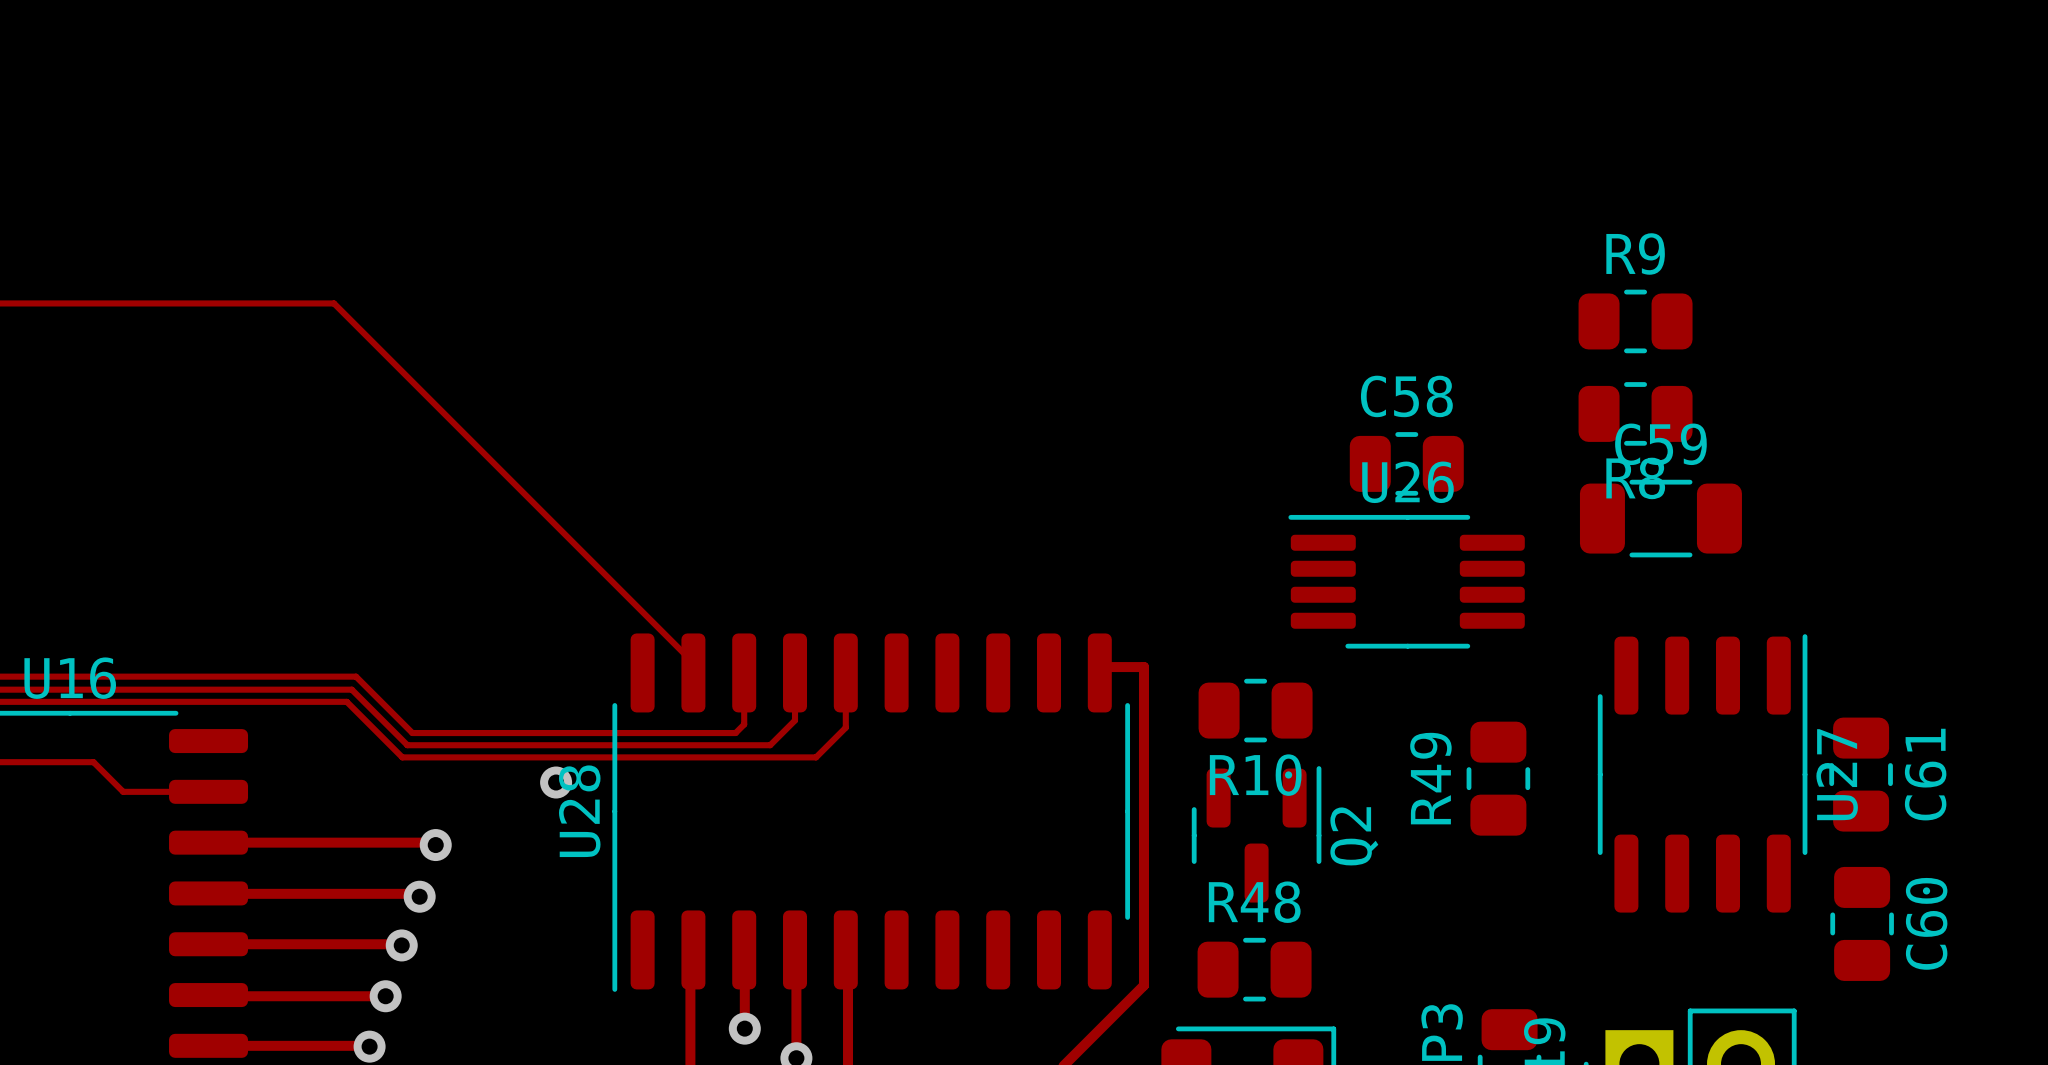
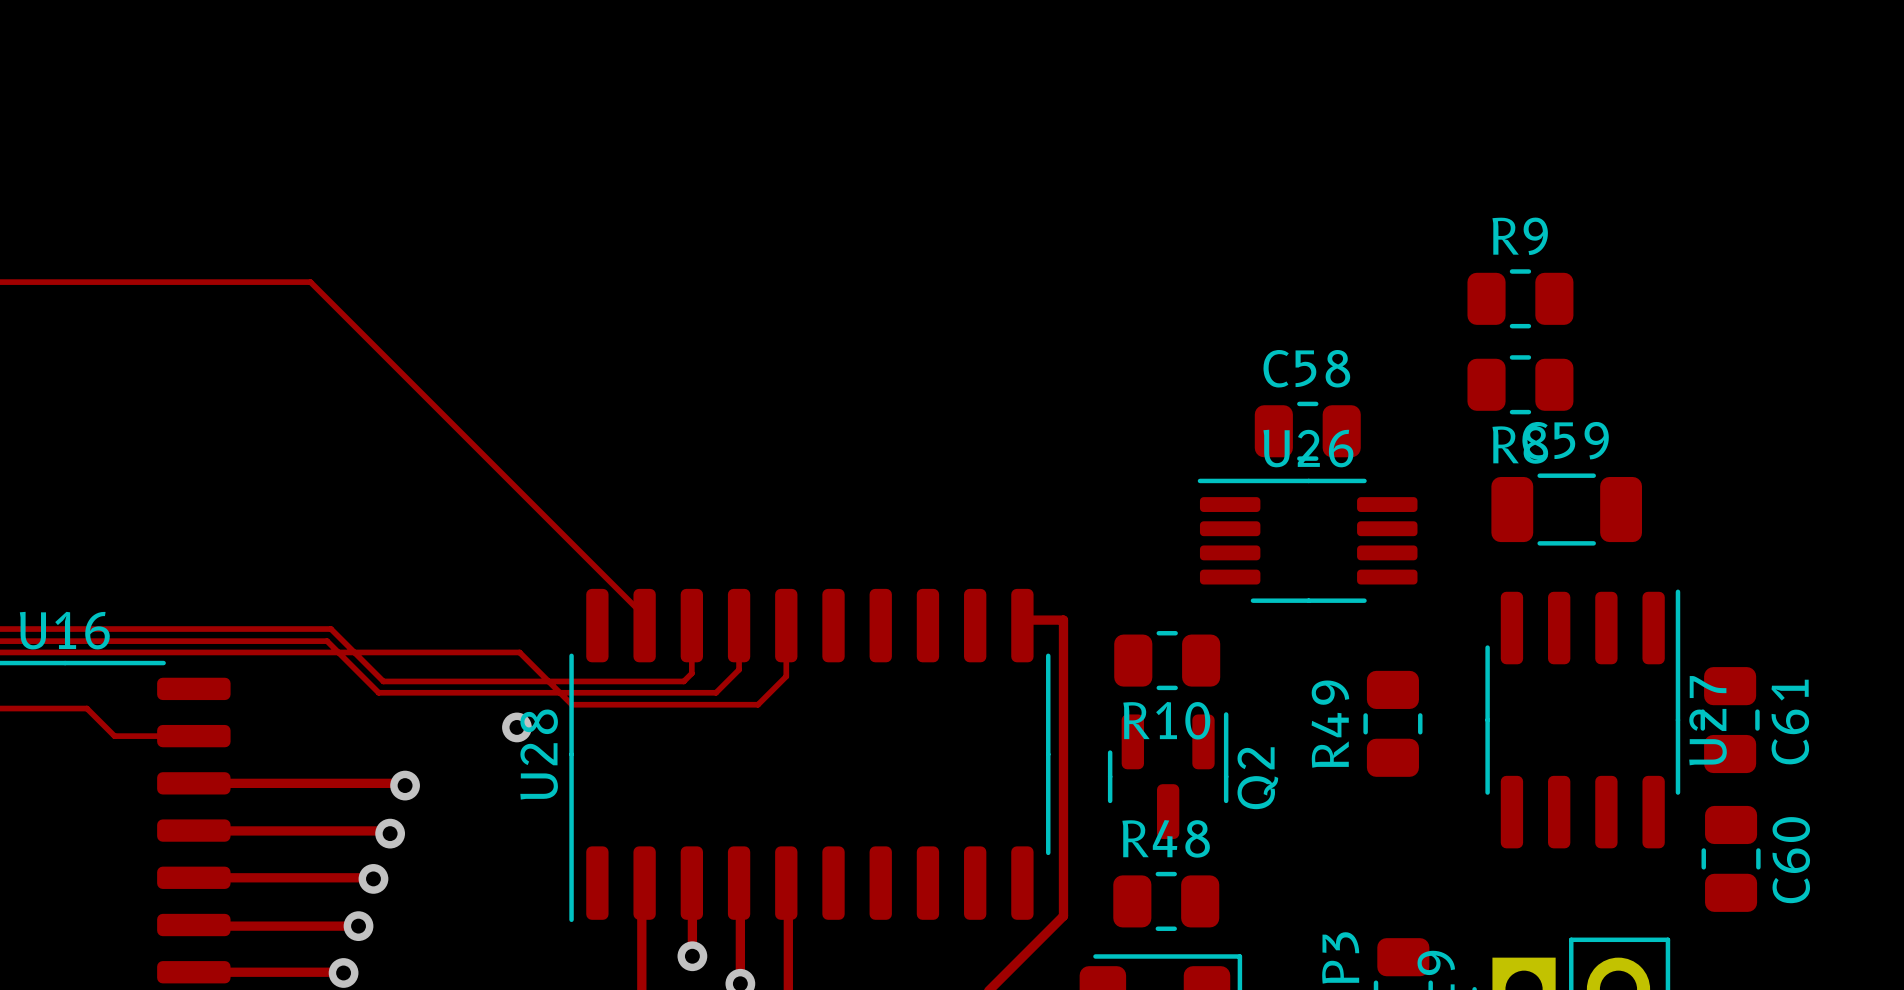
C59 position: (1660, 518) -> (1566, 509)
track: (346, 701) (402, 757) (816, 757) -> (322, 652) (519, 652) (571, 704) (758, 704)

